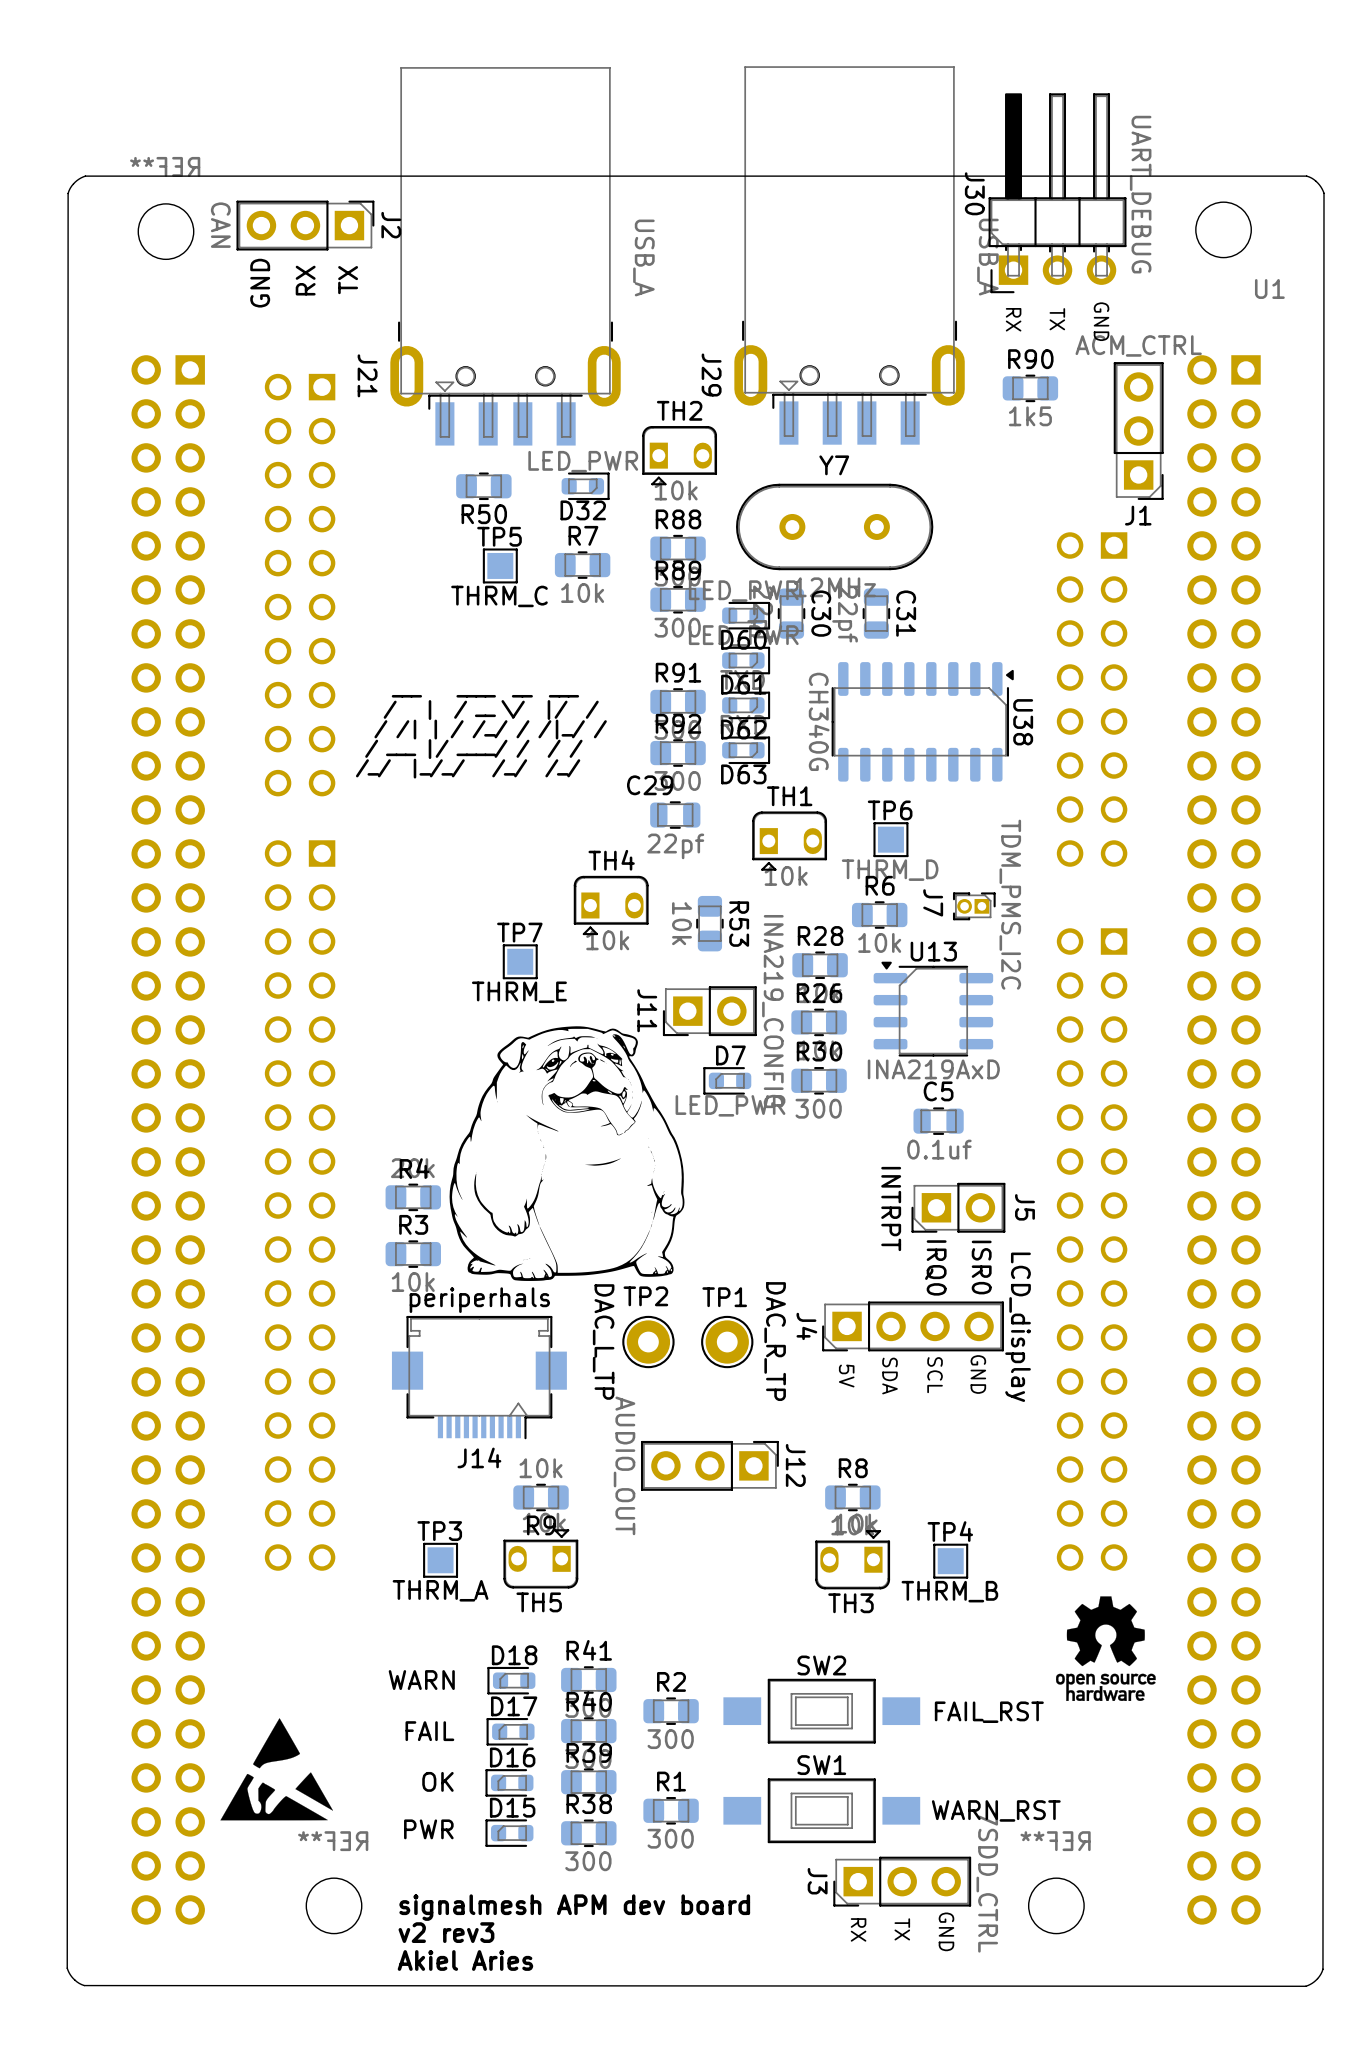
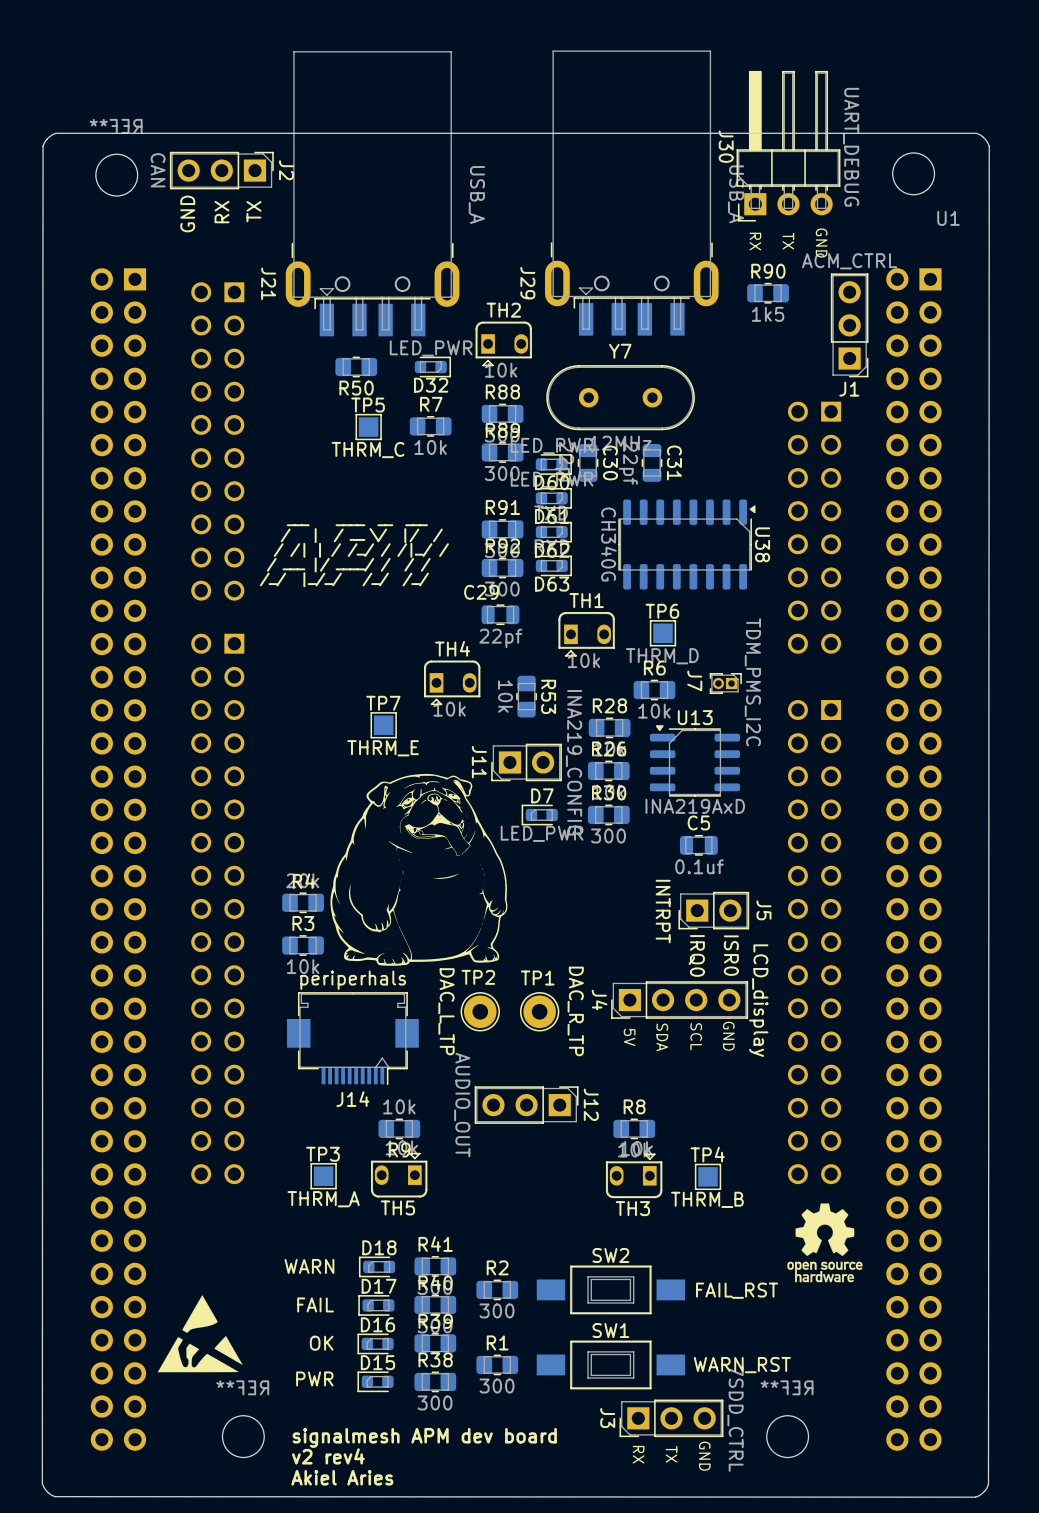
text: v2 rev3 (446, 1932) -> v2 rev4 (328, 1456)

